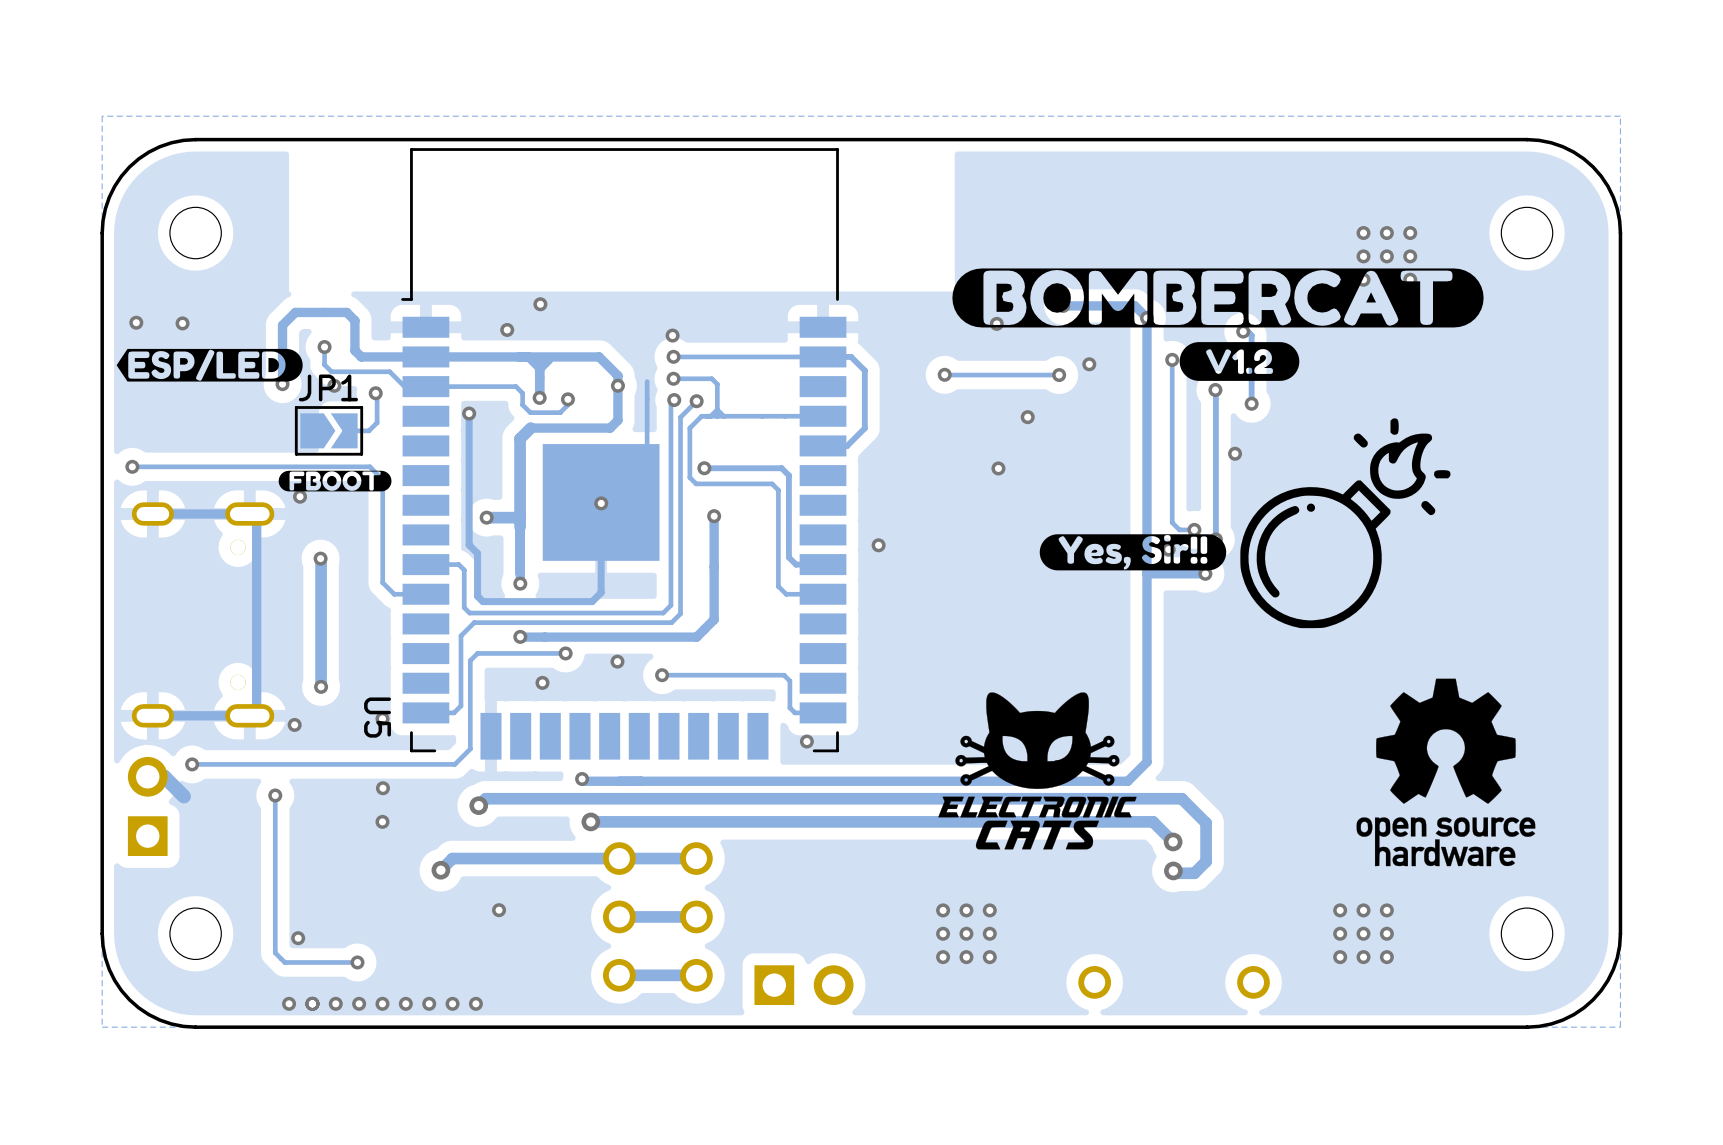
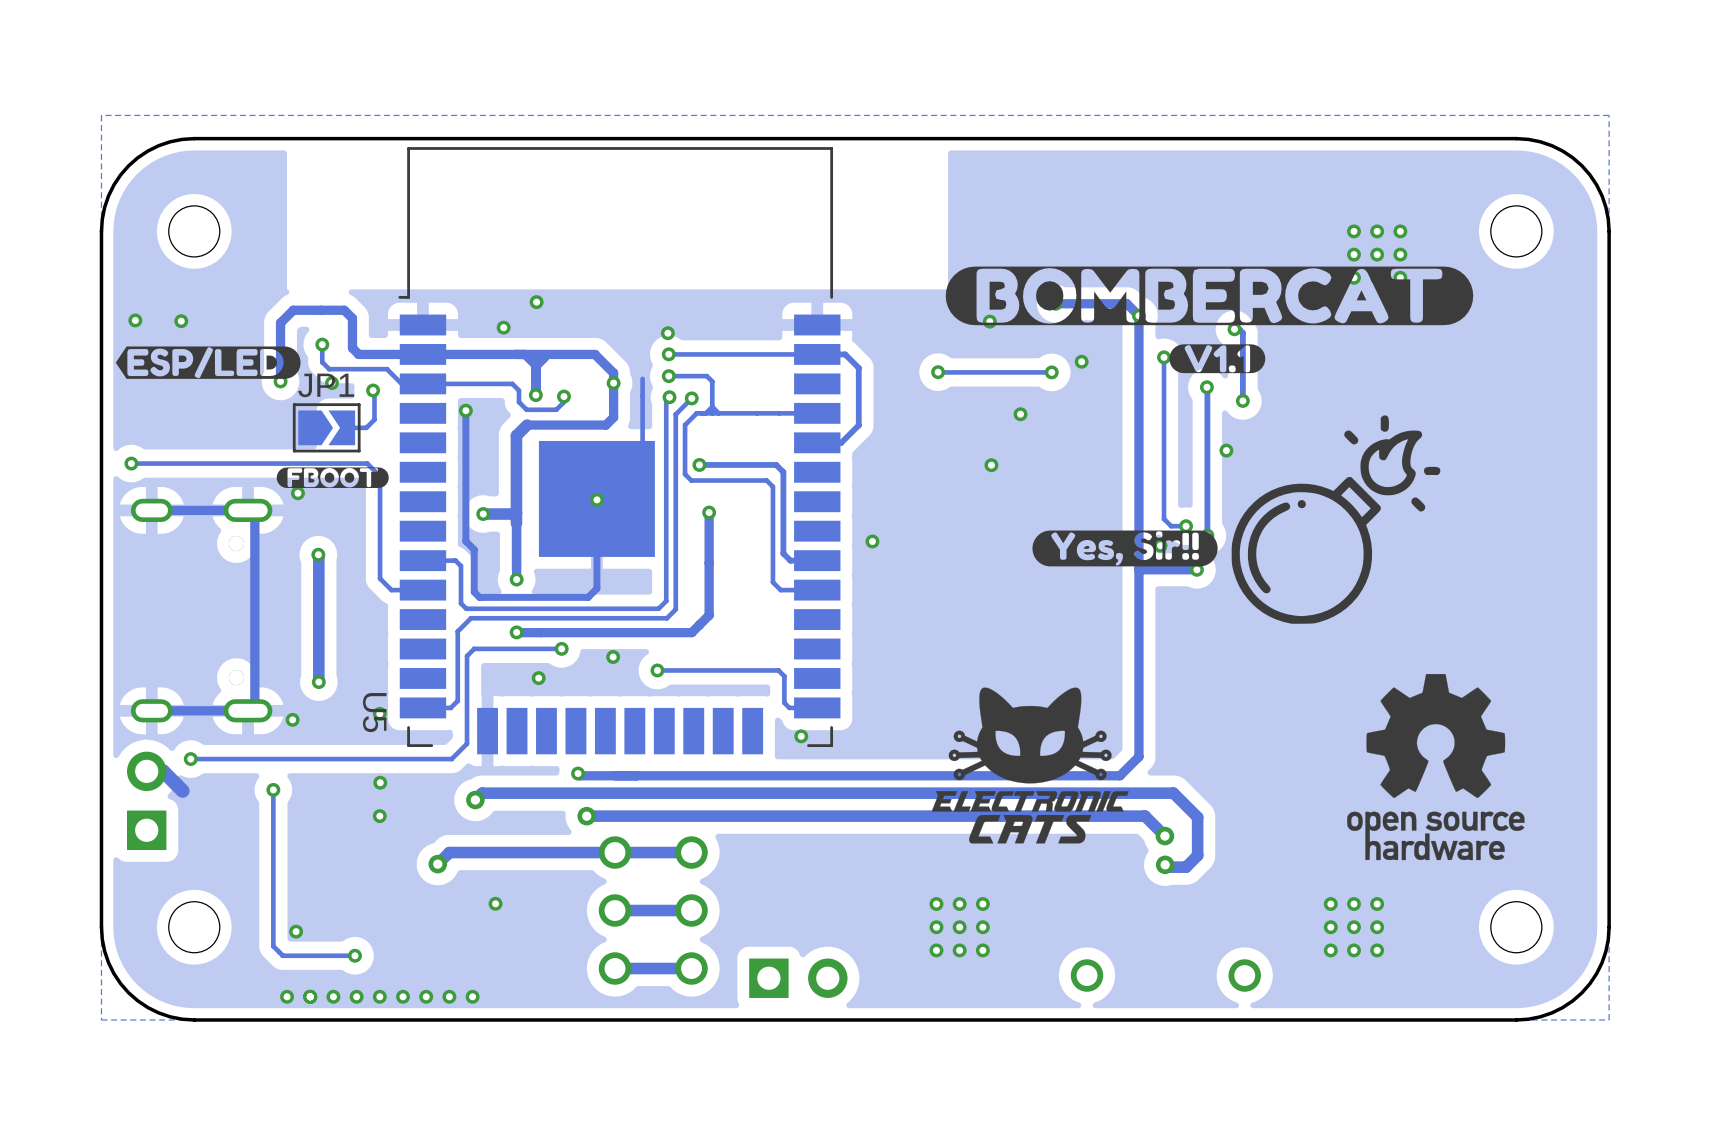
drawing shape: [1179, 342, 1300, 381] -> [1169, 344, 1266, 374]

